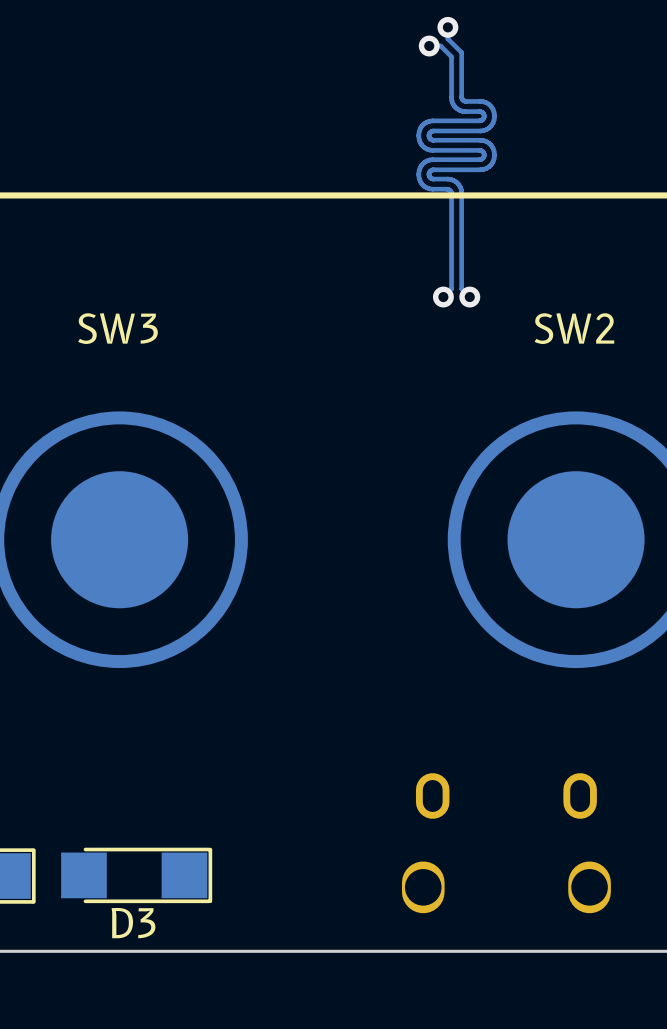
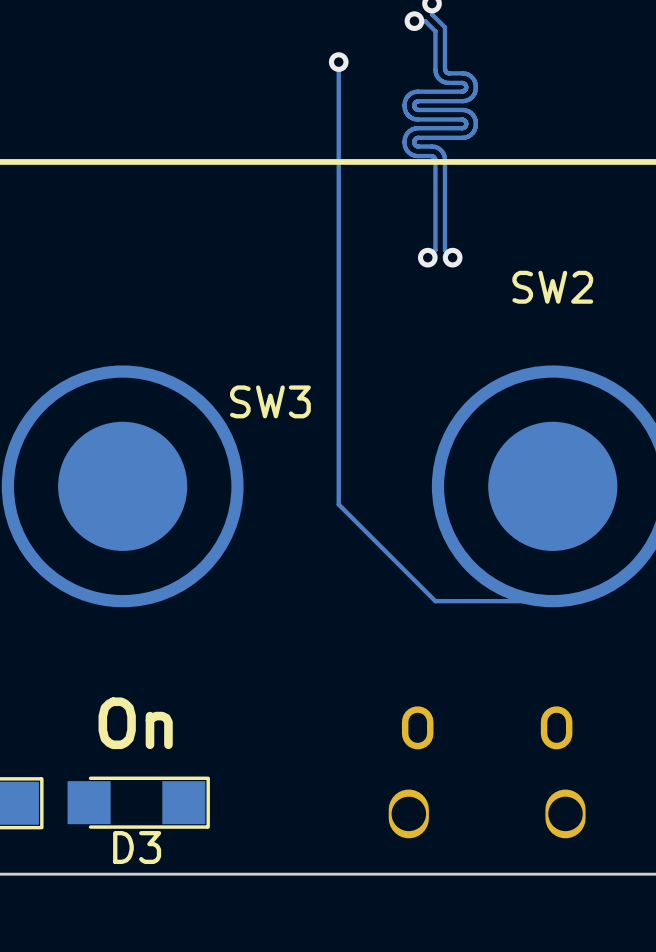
track: none -> (338, 62) (338, 504) (435, 601) (552, 601)
via: none -> (338, 62)
SW3 name position: SW3 (117, 328) -> SW3 (270, 401)
text: none -> On (135, 723)

